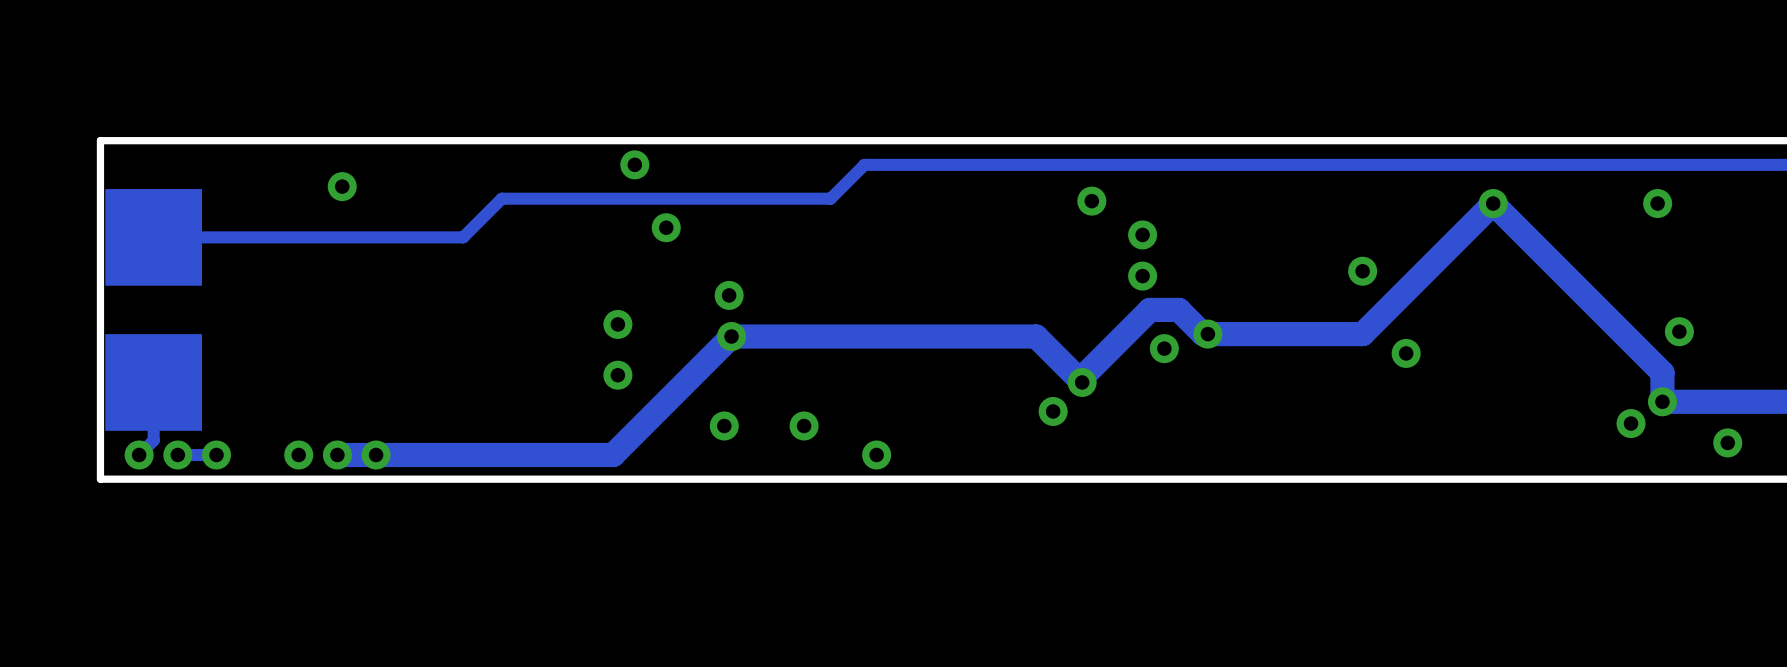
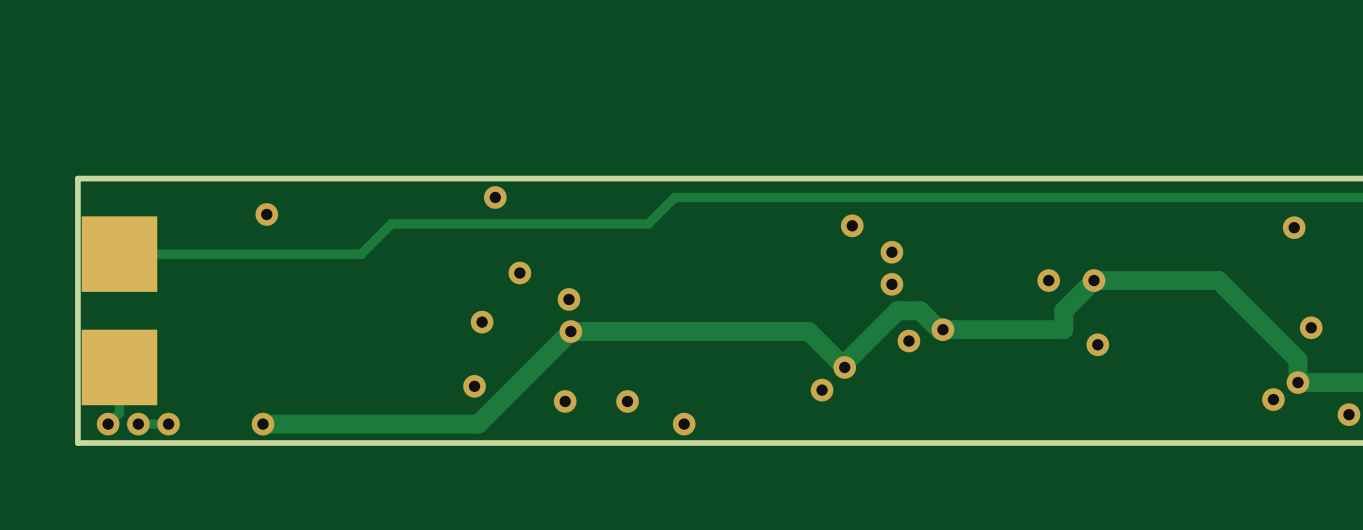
via: (1493, 203) -> none
via position: (666, 227) -> (519, 273)
via position: (1362, 271) -> (1048, 280)
via: none -> (1094, 280)
track: (1560, 271) (1493, 203) (1362, 334) -> (1218, 280) (1094, 280) (1063, 310) (1063, 329)
via position: (617, 375) -> (474, 386)
via: (298, 455) -> none
via: (376, 455) -> none

